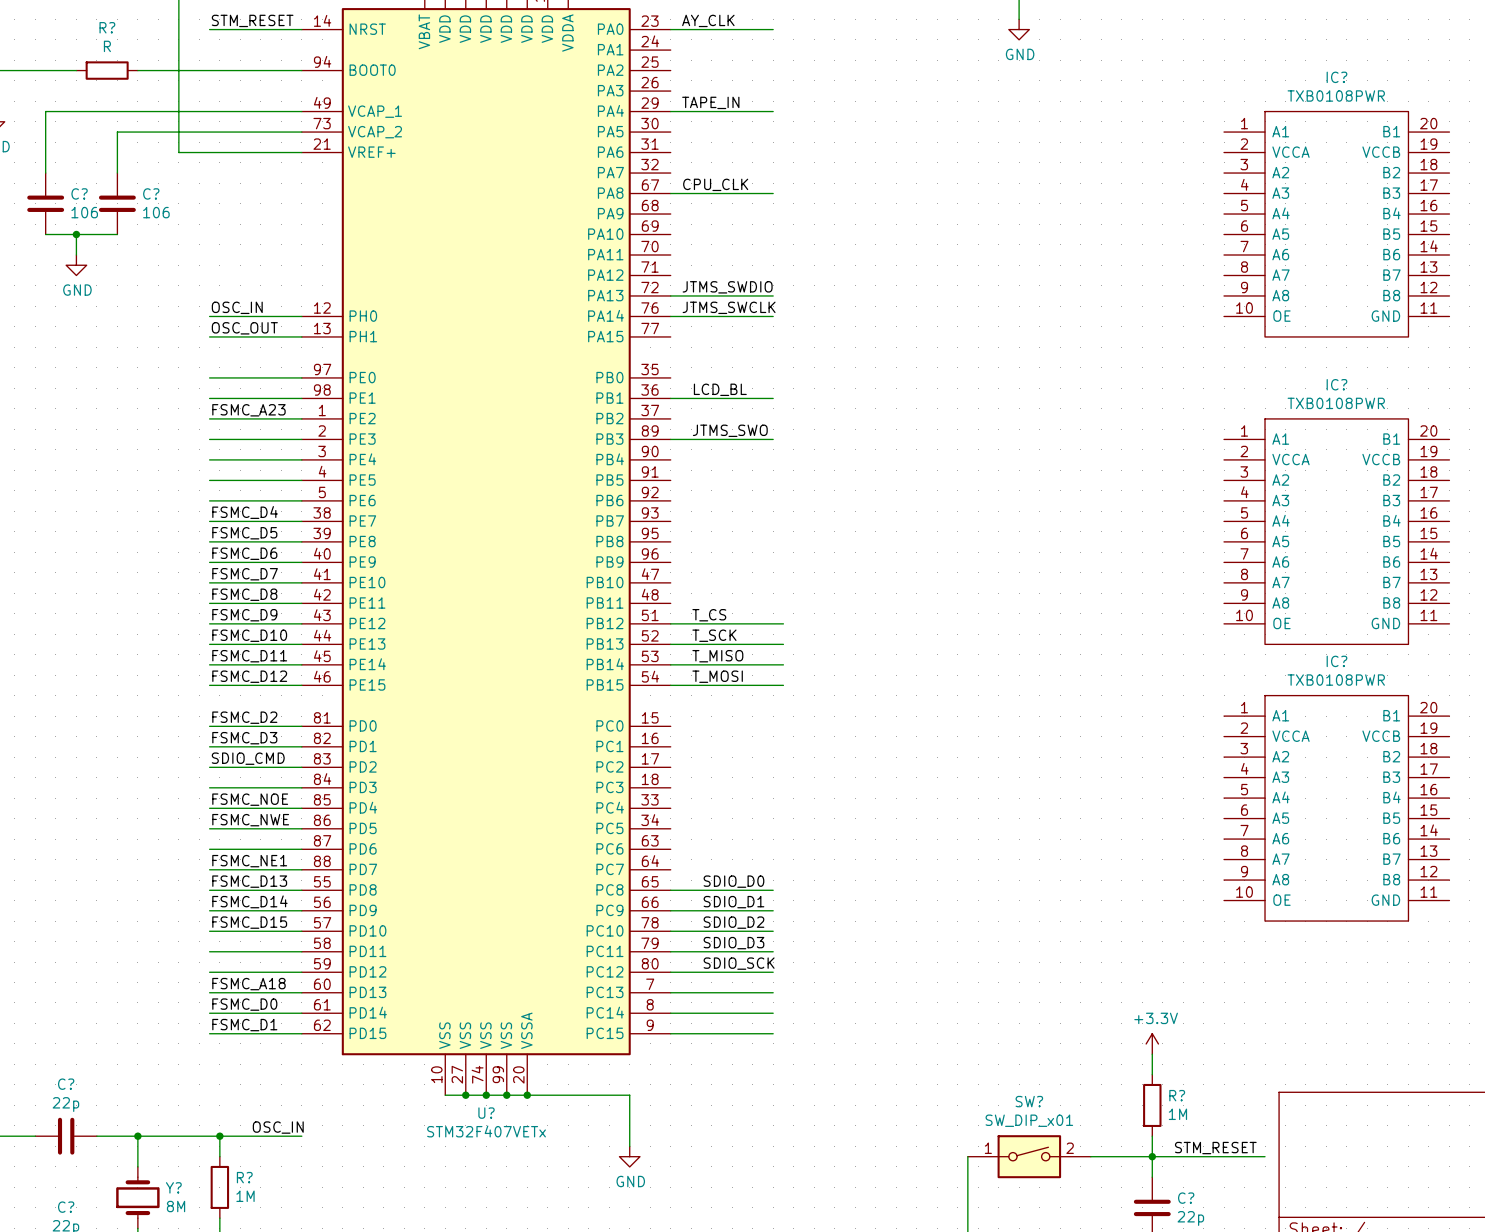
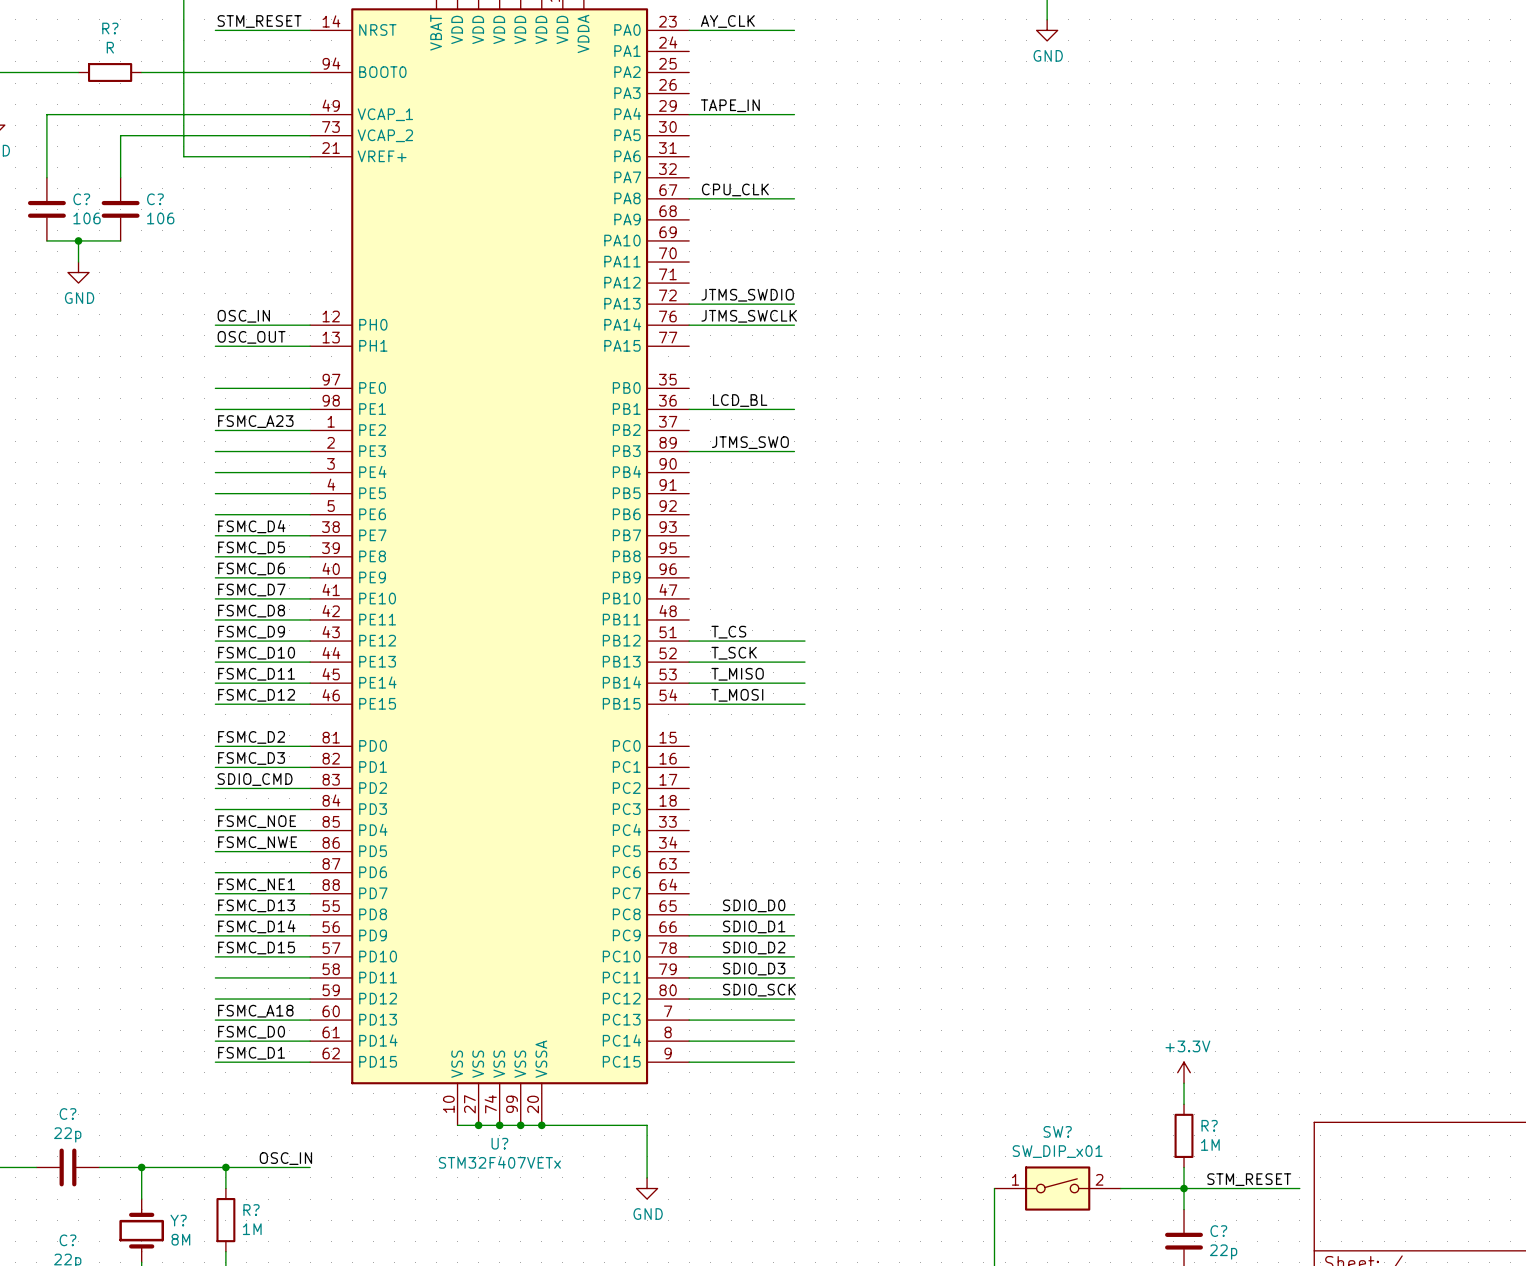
IC?: TXB0108PWR (1336, 224) -> none
IC?: TXB0108PWR (1336, 531) -> none
IC?: TXB0108PWR (1336, 808) -> none

